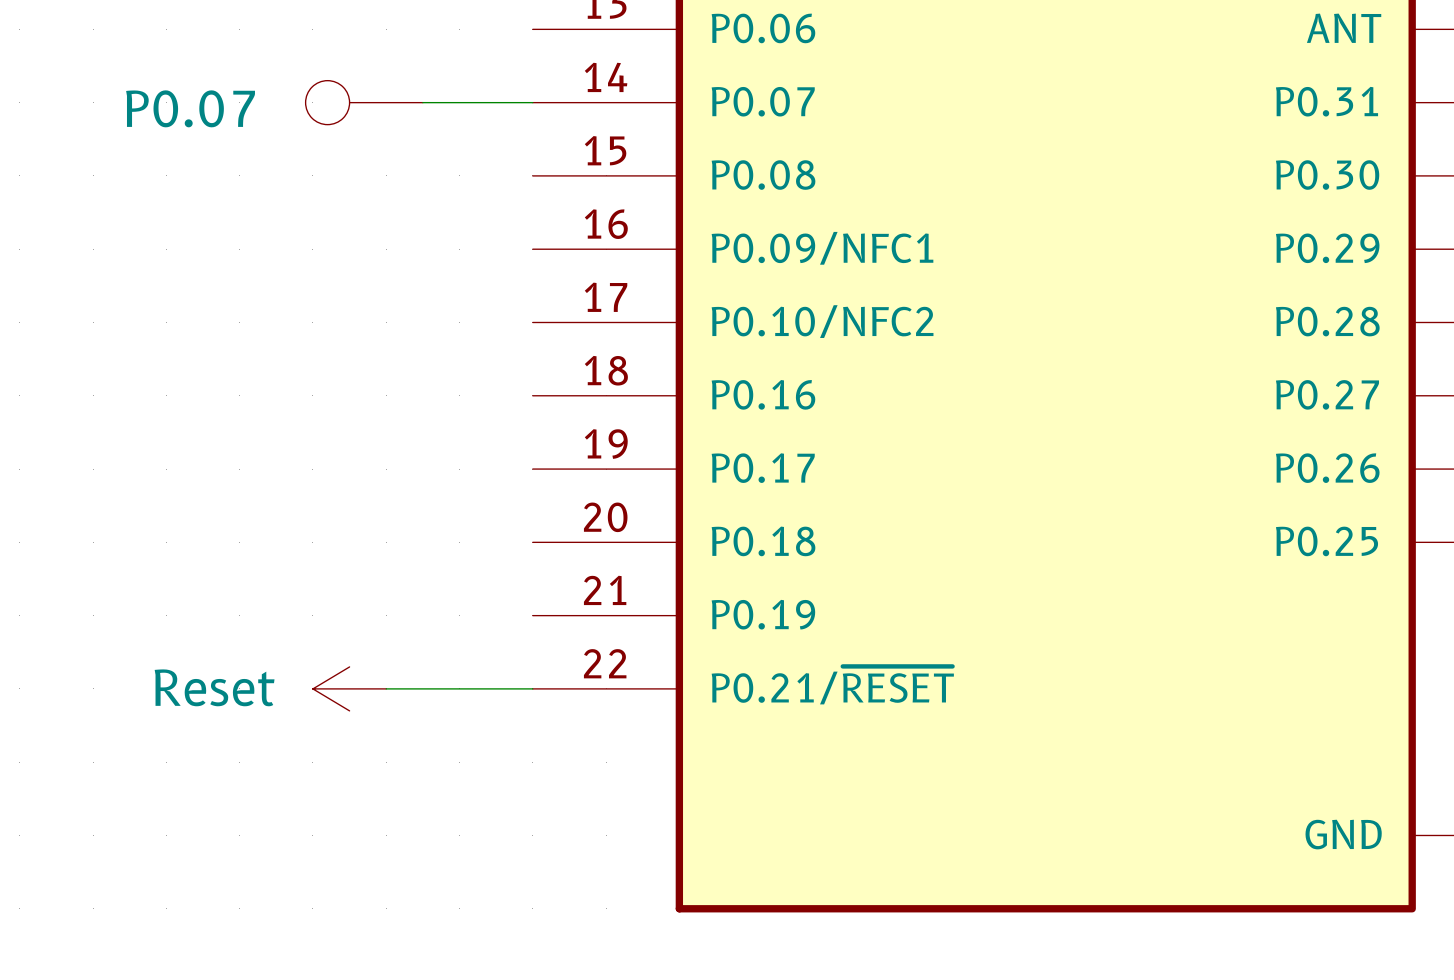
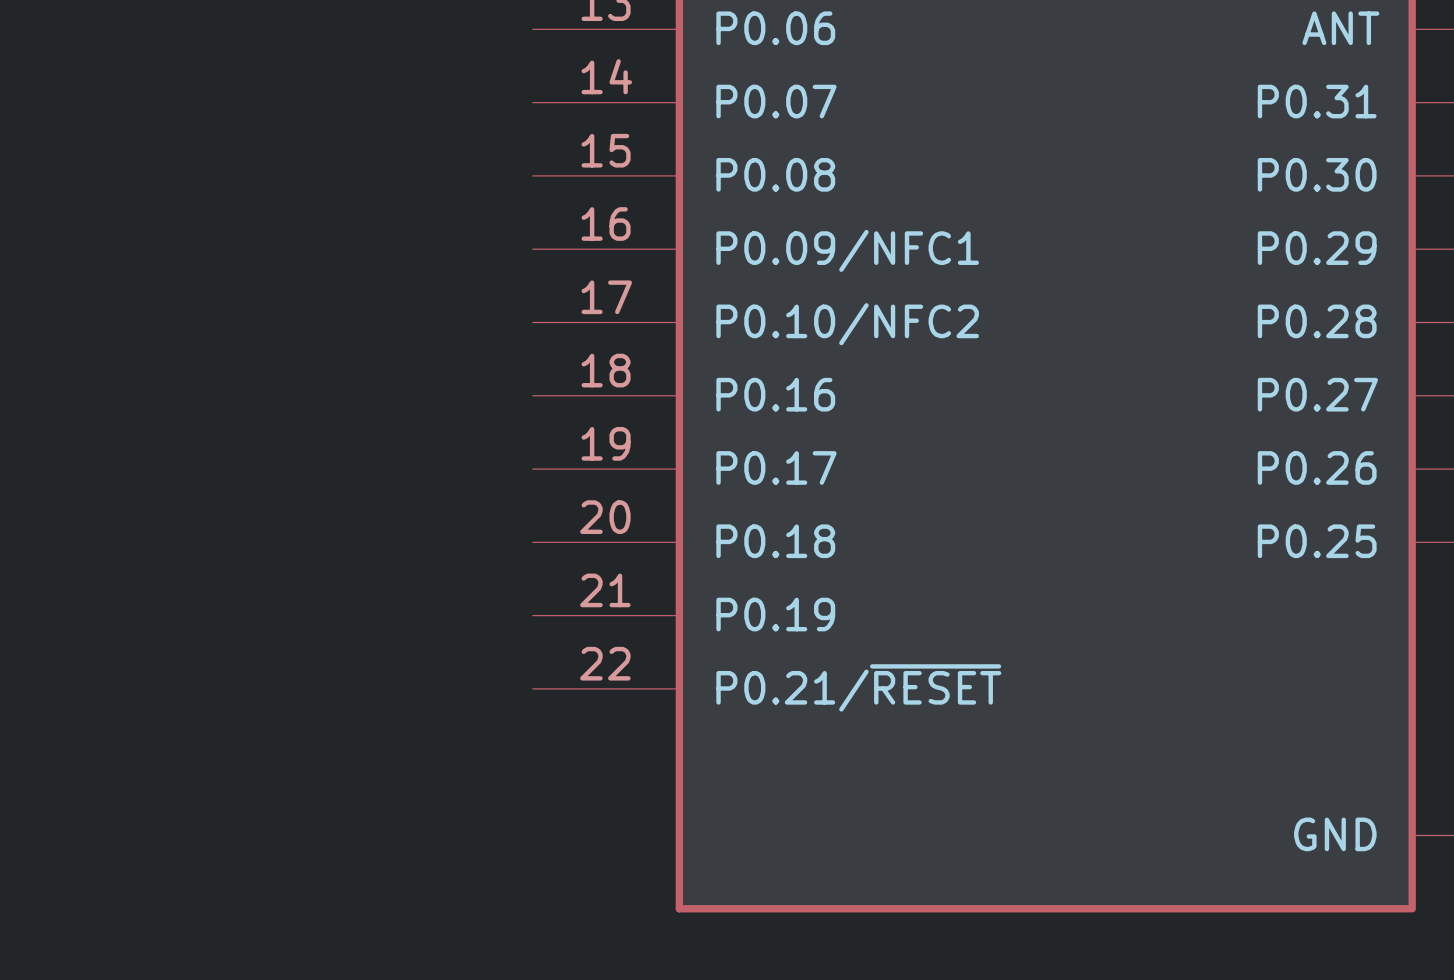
P0.07: (364, 102) -> none
wire: (422, 102) (532, 102) -> none
power symbol: Reset (349, 688) -> none
wire: (386, 688) (532, 688) -> none

